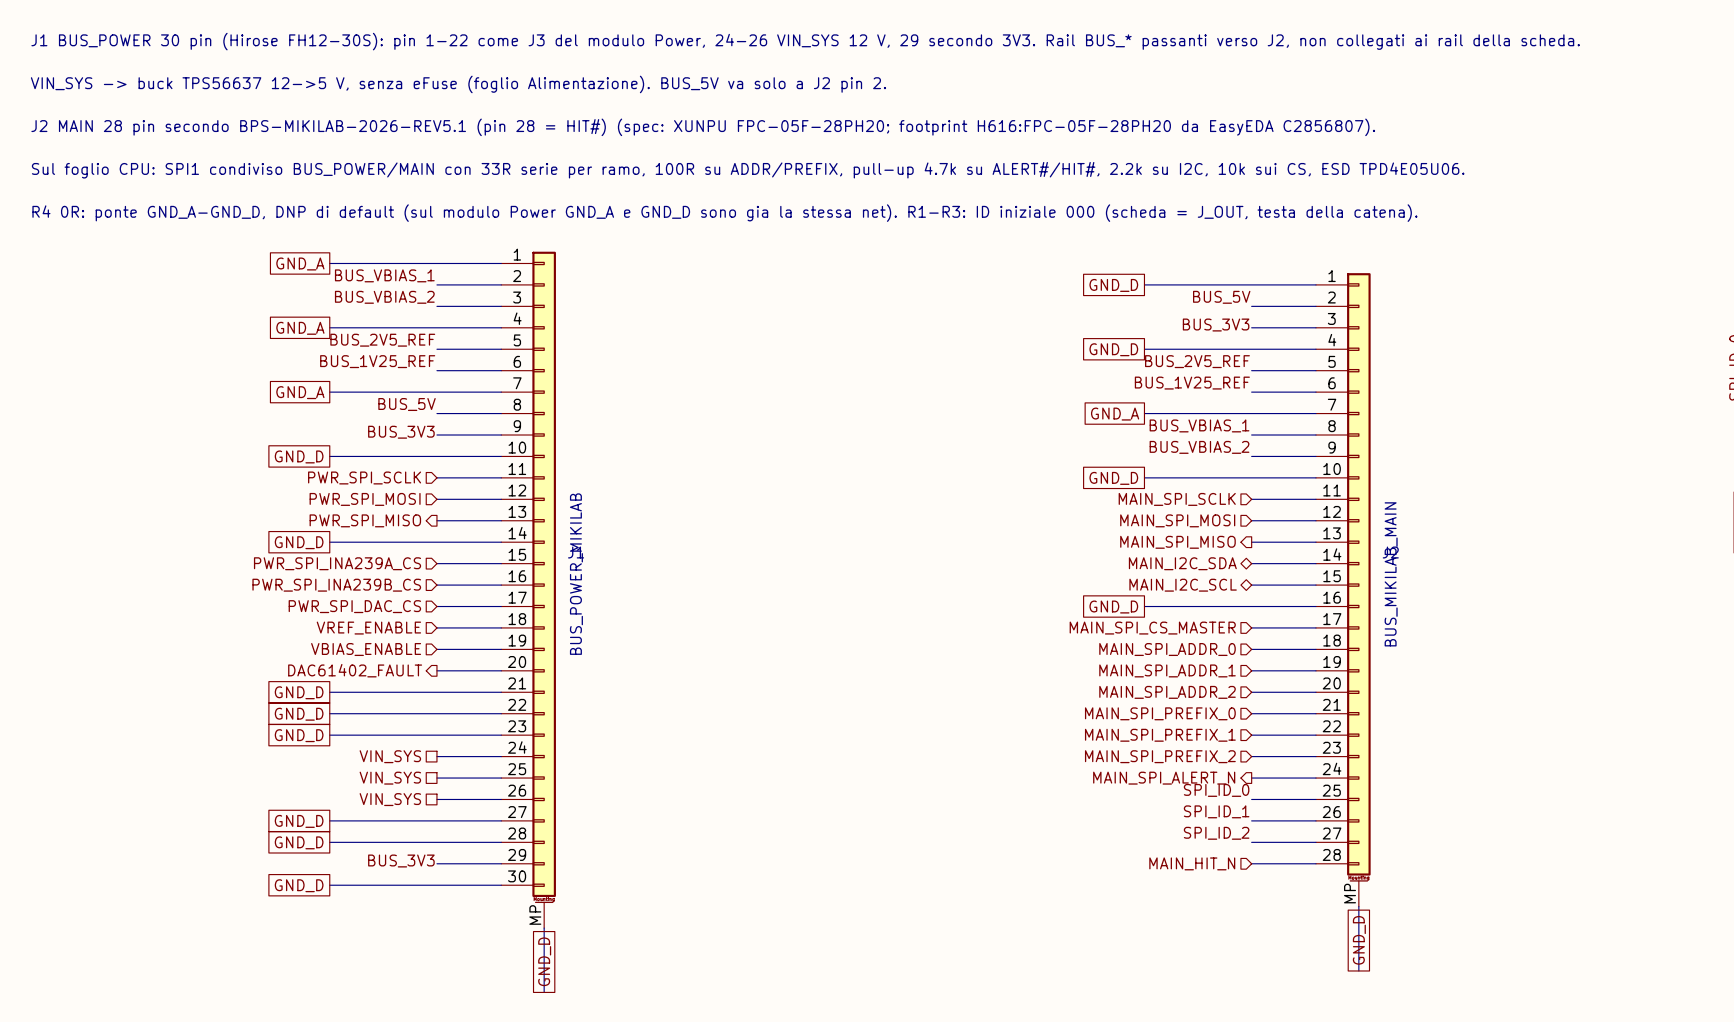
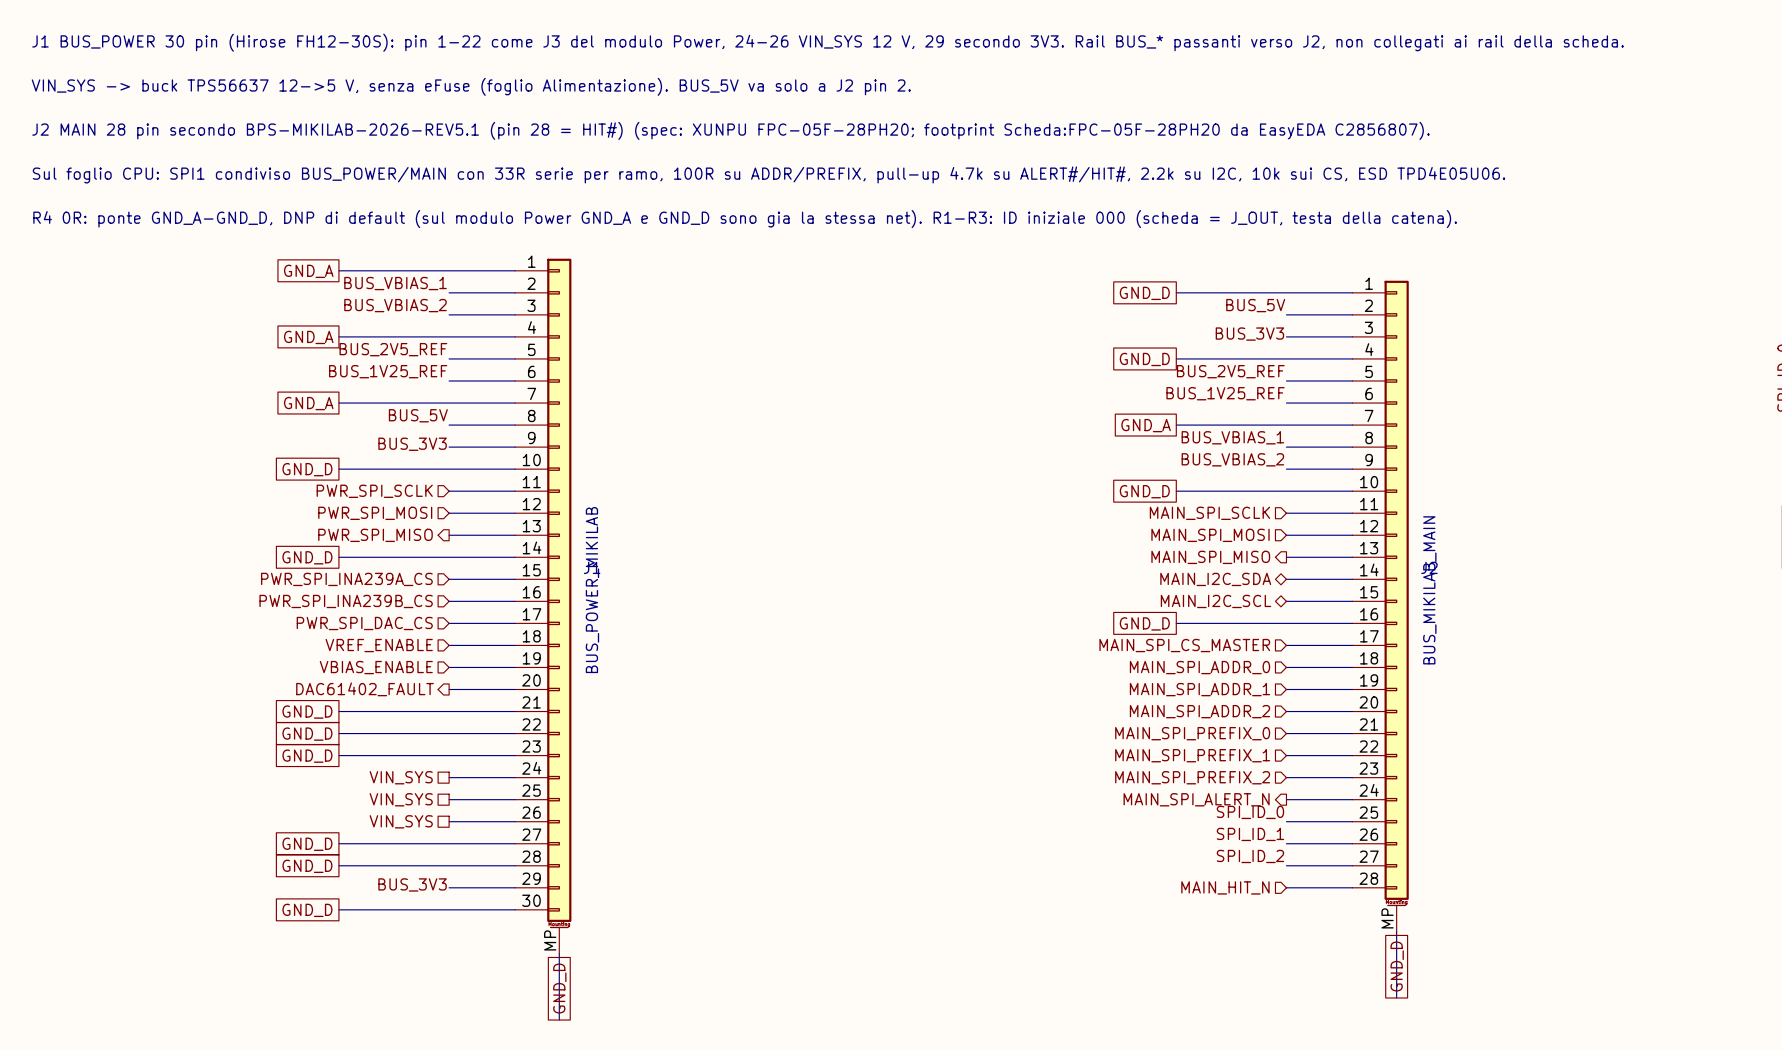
text: J2 MAIN 28 pin secondo BPS-MIKILAB-2026-REV5.1 (pin 28 = HIT#) (spec: XUNPU FPC-05F-28PH20; footprint H616:FPC-05F-28PH20 da EasyEDA C2856807). (703, 127) -> J2 MAIN 28 pin secondo BPS-MIKILAB-2026-REV5.1 (pin 28 = HIT#) (spec: XUNPU FPC-05F-28PH20; footprint Scheda:FPC-05F-28PH20 da EasyEDA C2856807). (730, 130)

